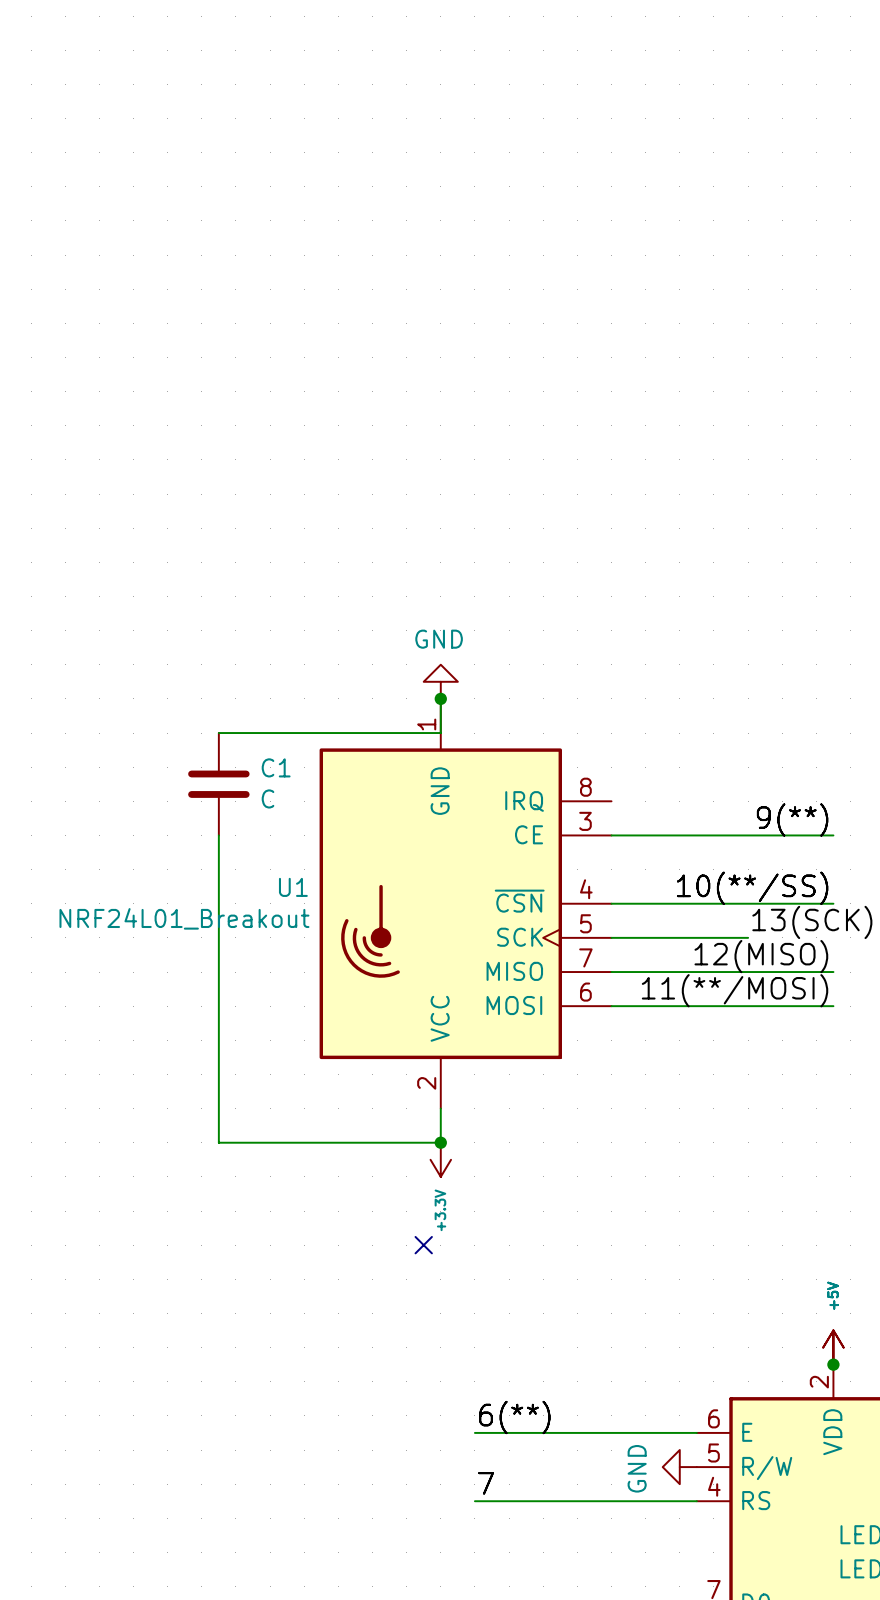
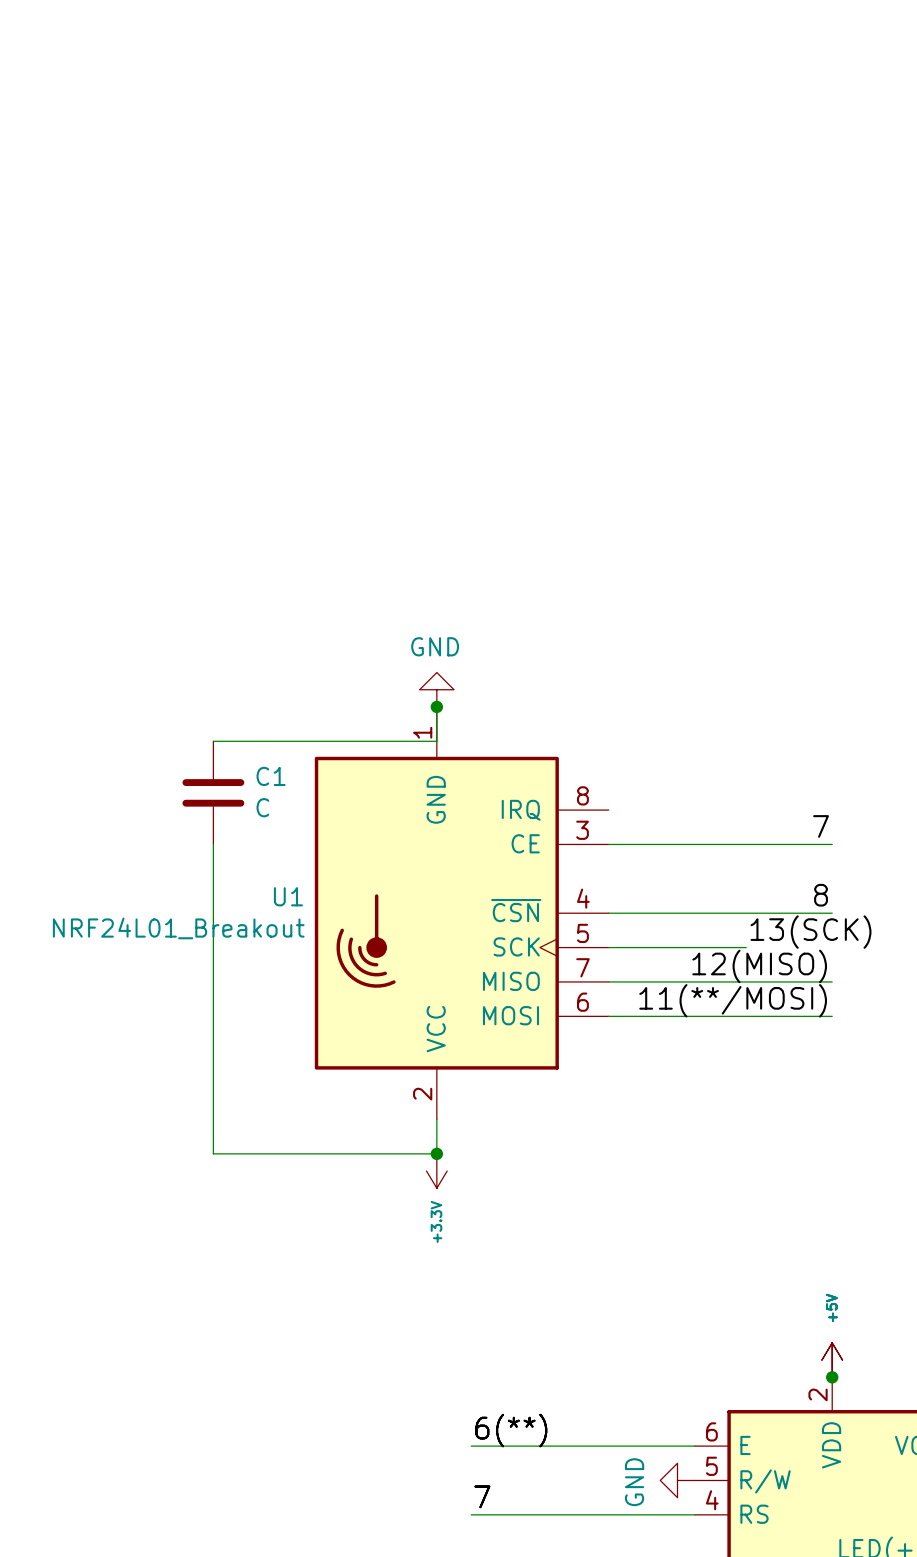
label: 9(**) (792, 820) -> 7 (821, 826)
label: 10(**/SS) (752, 888) -> 8 (821, 895)
no-connect mark: (423, 1245) -> none

